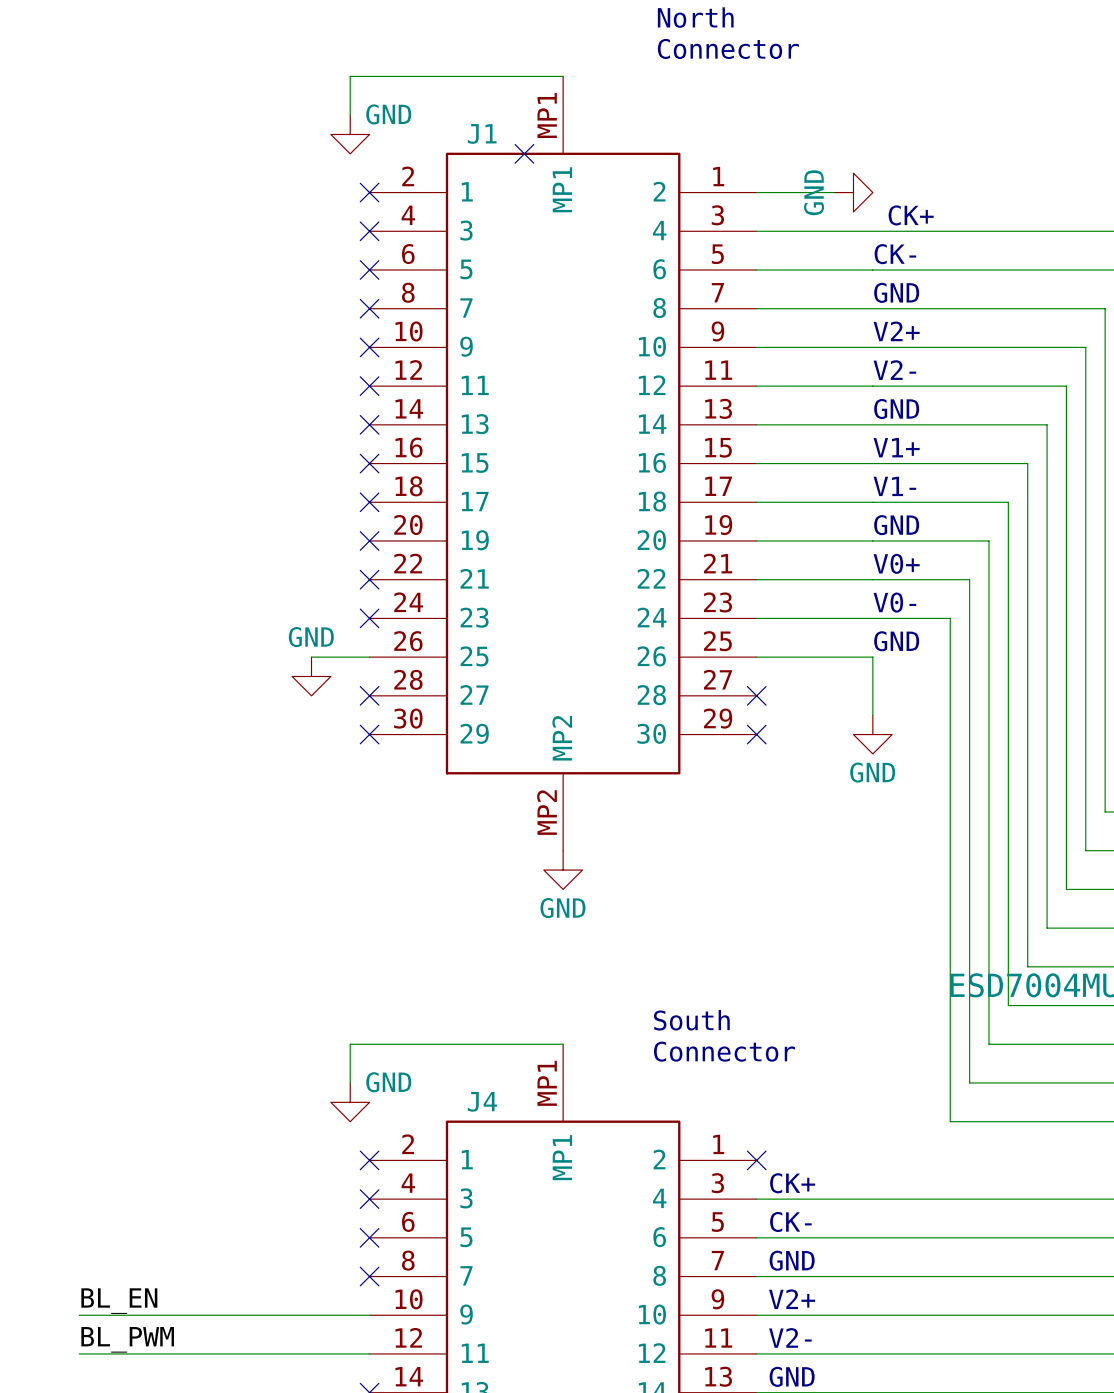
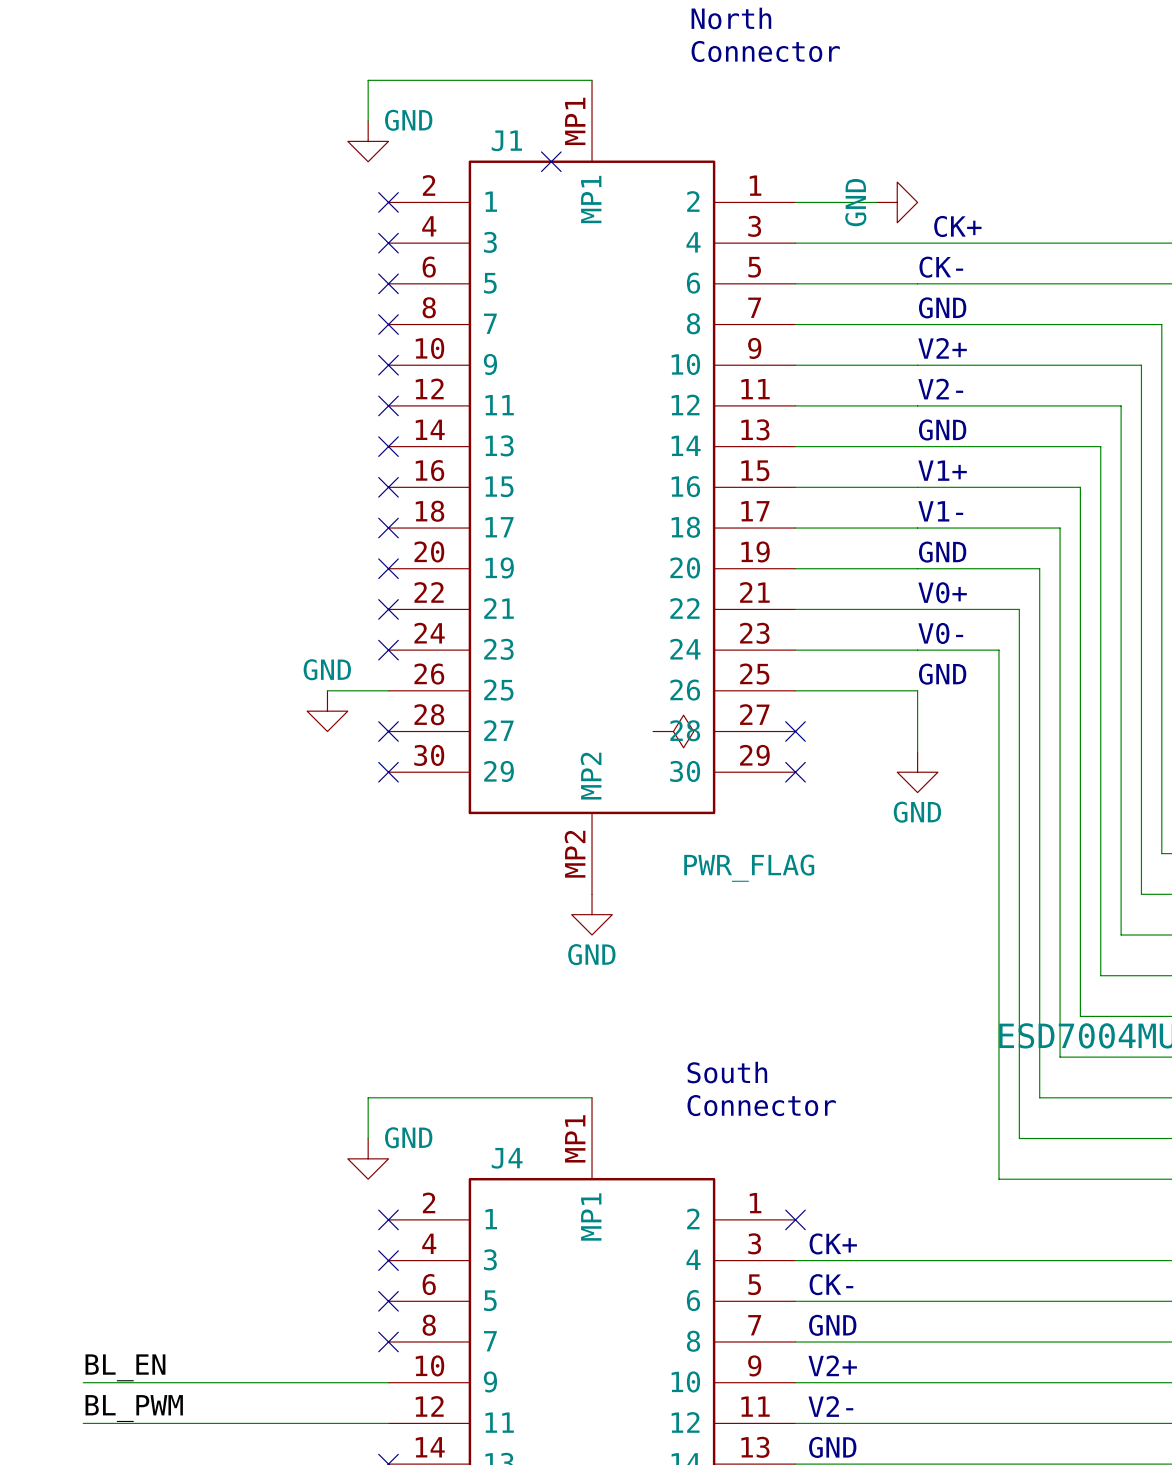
power symbol: none -> PWR_FLAG (673, 731)

